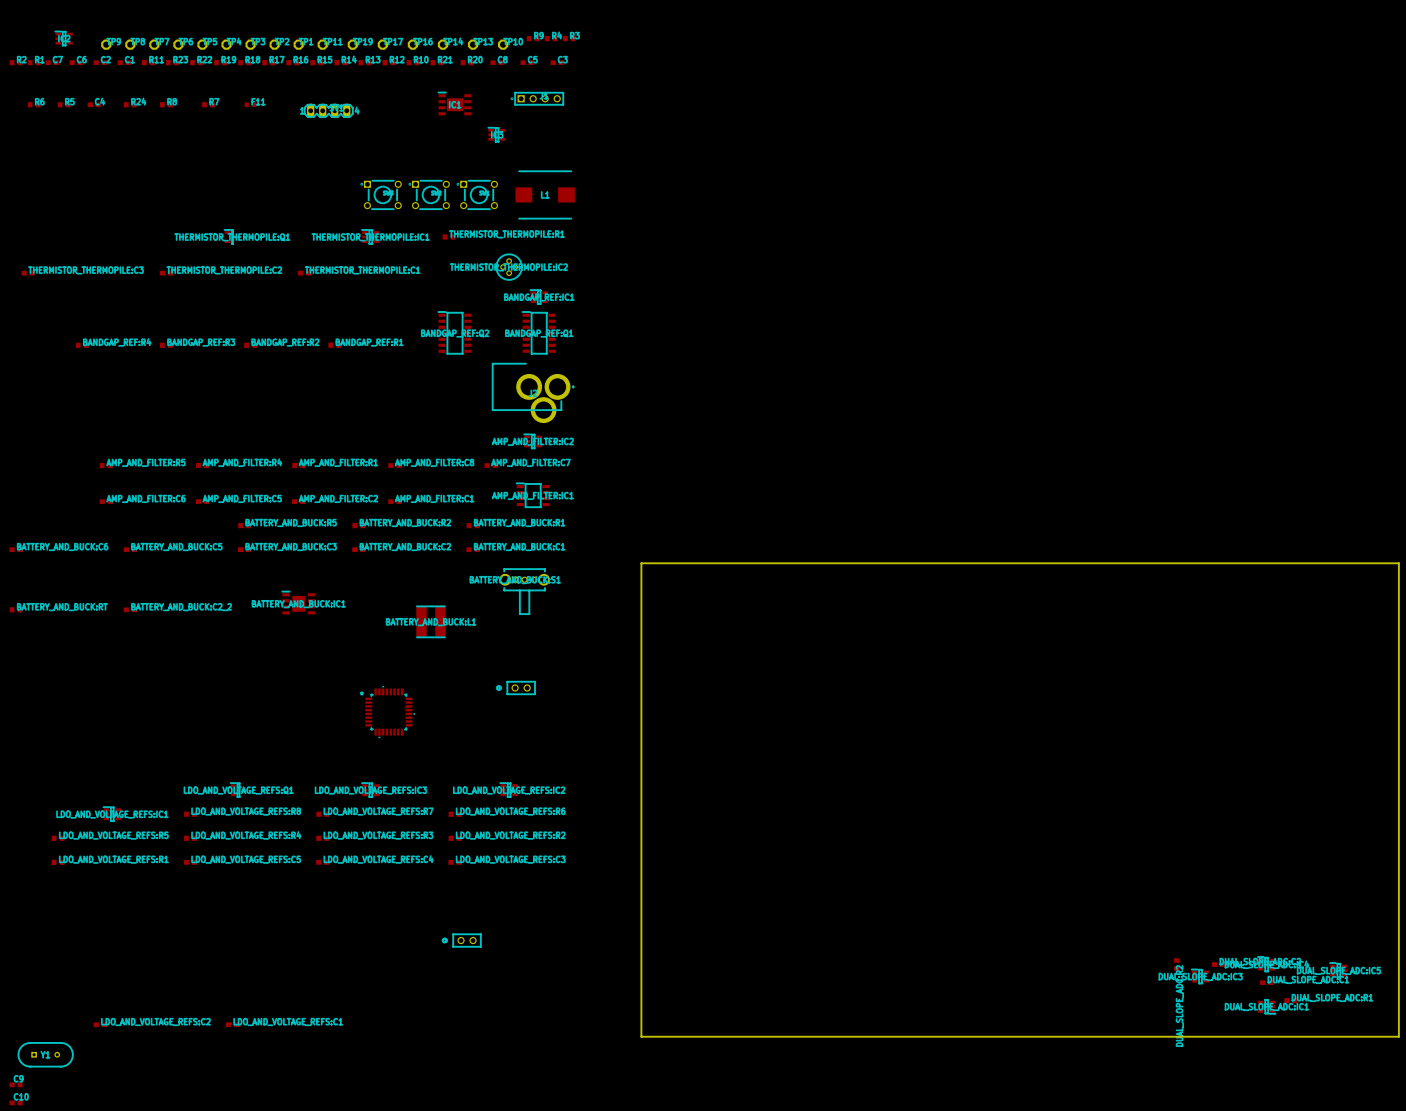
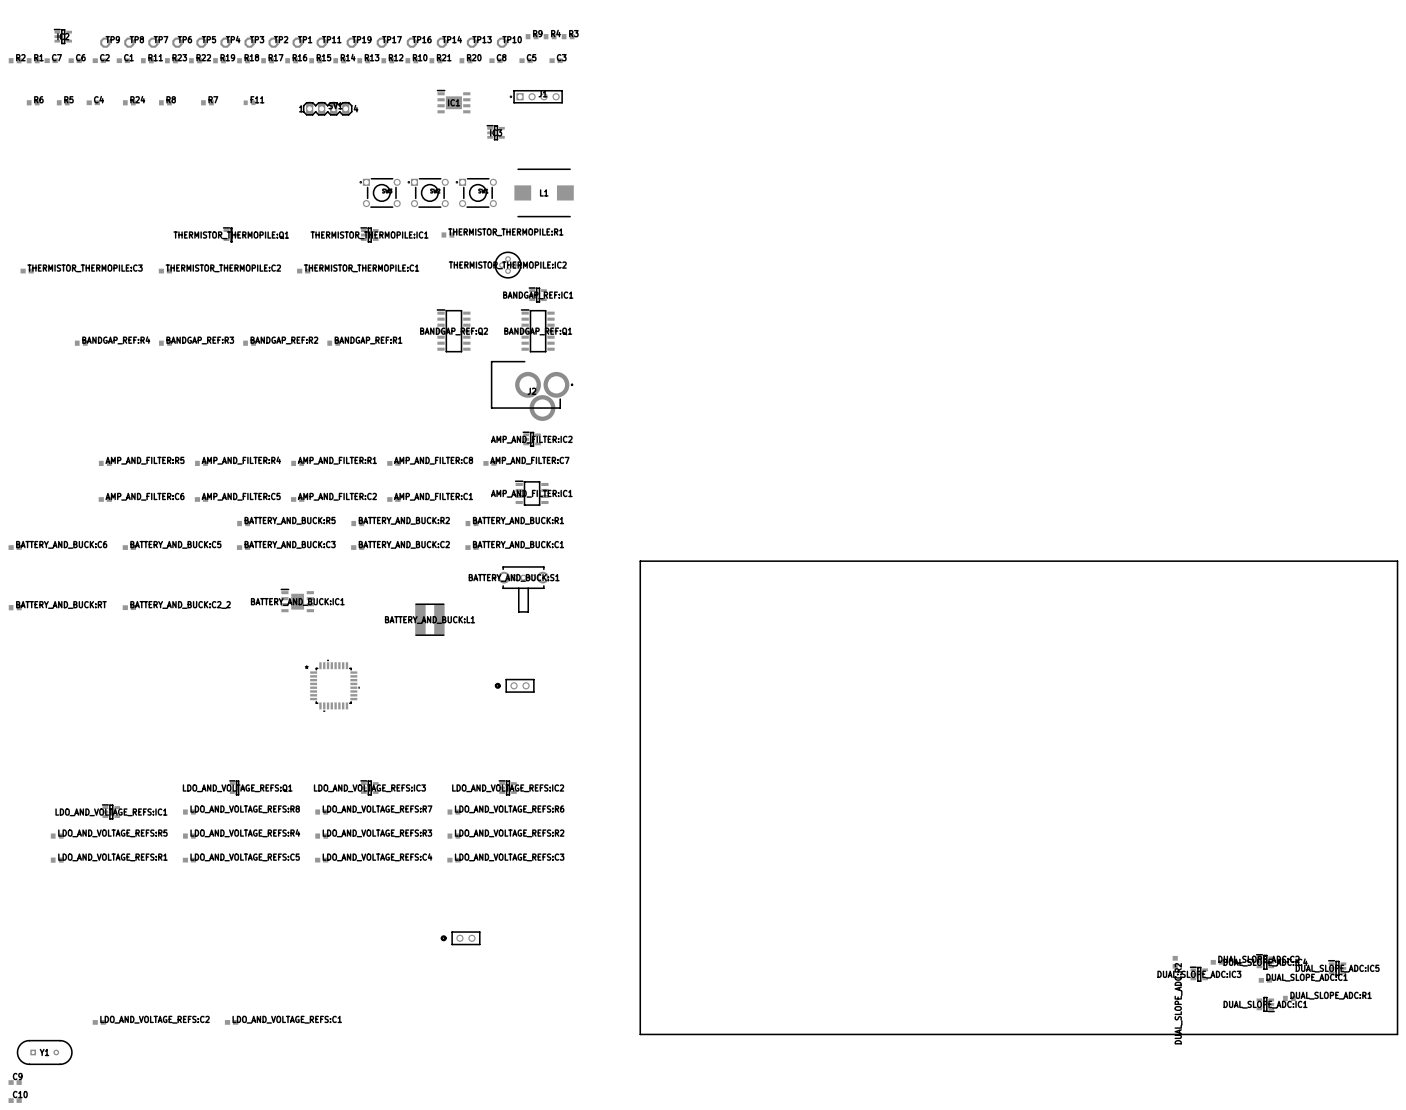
part position: (390, 712) -> (334, 685)

